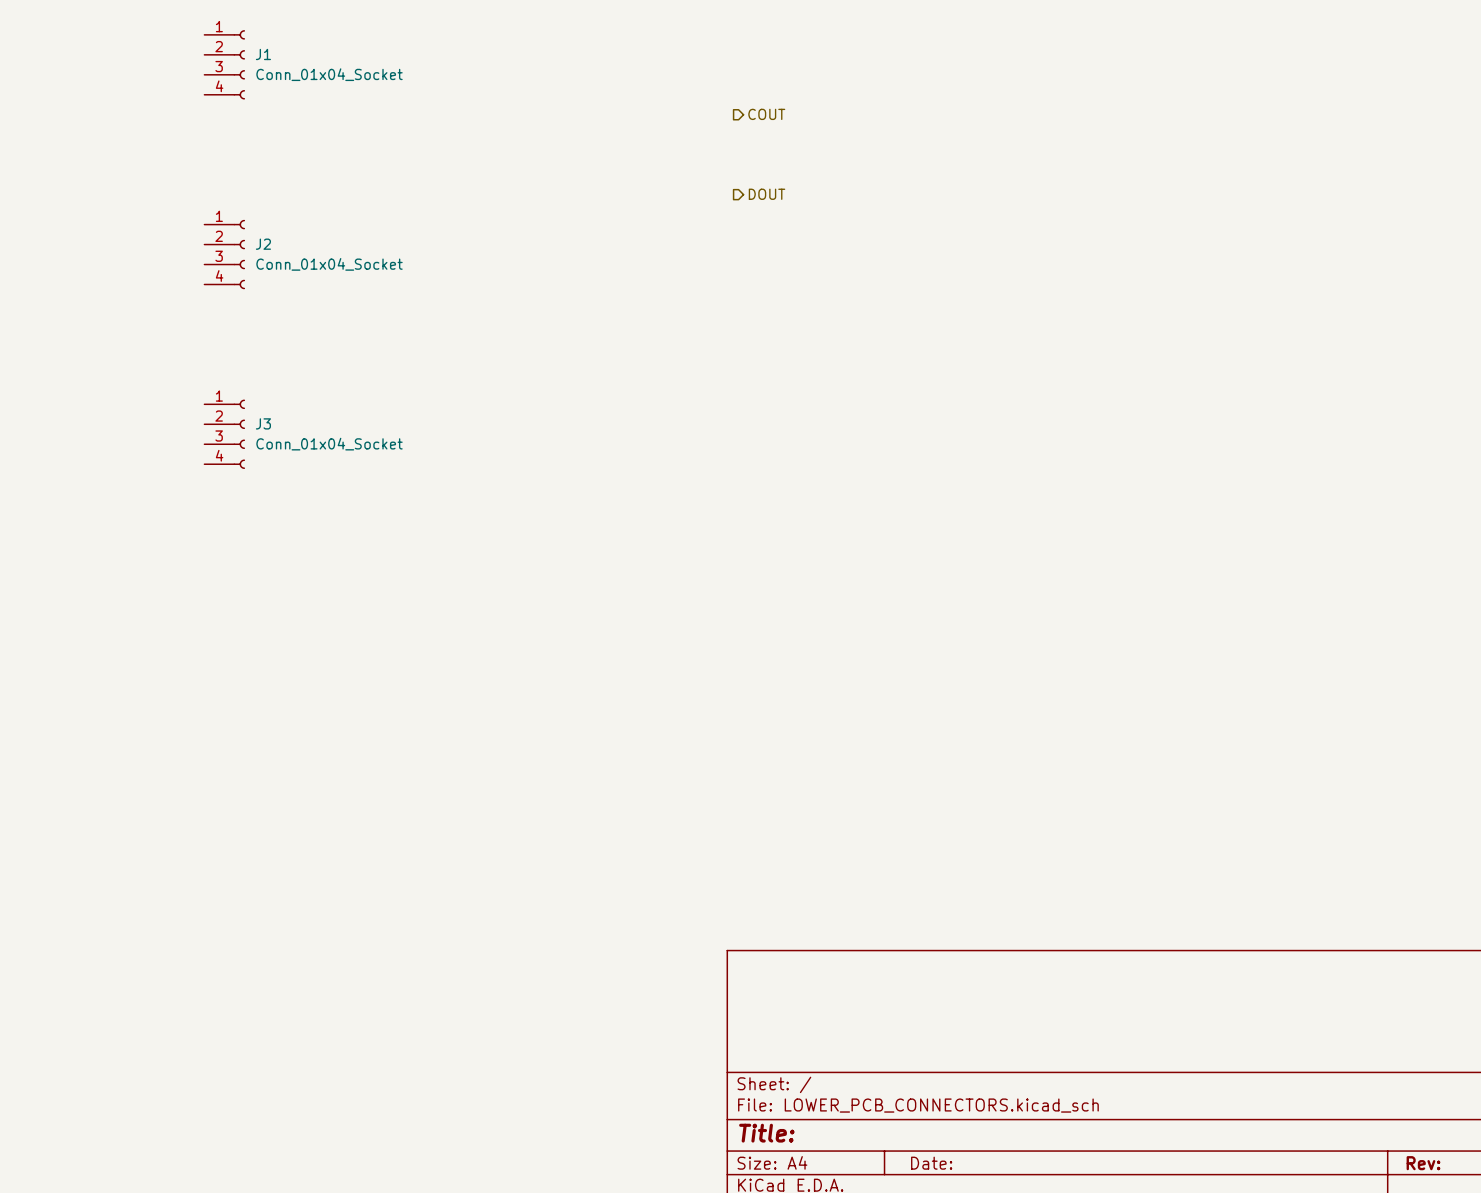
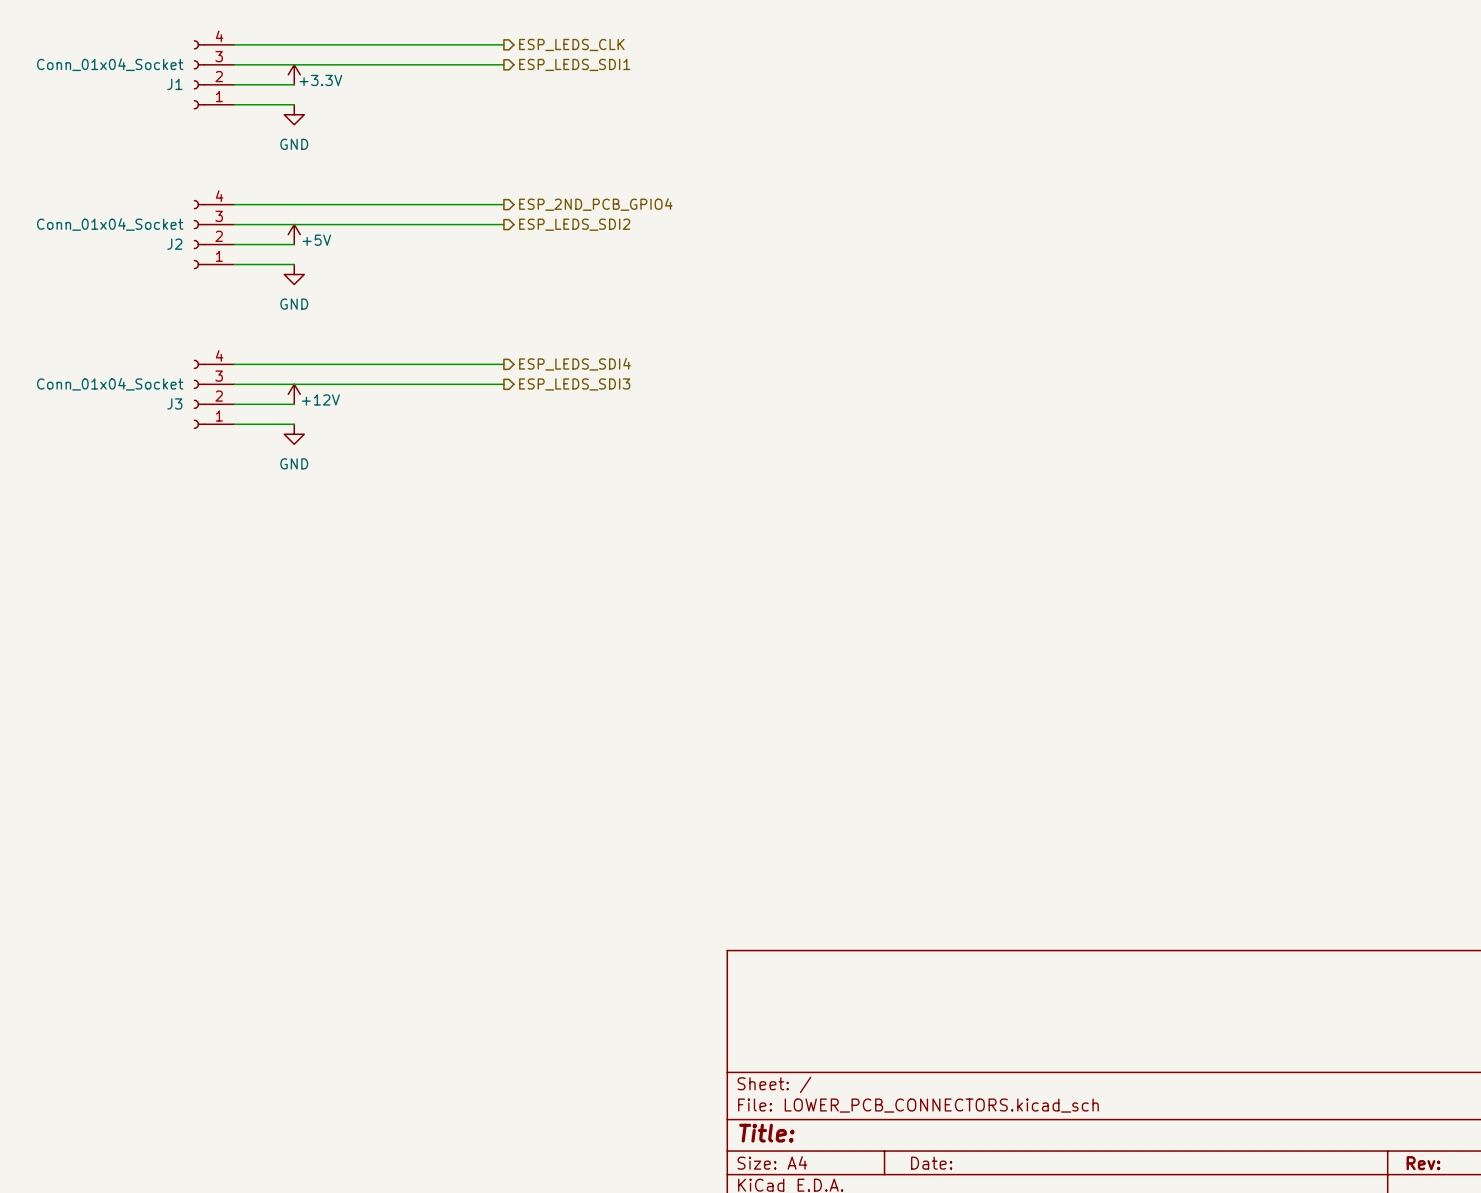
wire: none -> (234, 44) (503, 44)
hierarchical label: none -> ESP_LEDS_CLK (571, 44)
wire: none -> (234, 64) (503, 64)
J1 rotation: 0° (239, 64) -> 180° (199, 74)
hierarchical label: none -> ESP_LEDS_SDI1 (574, 64)
power symbol: none -> +3.3V (294, 74)
wire: none -> (234, 84) (294, 84)
wire: none -> (234, 104) (294, 104)
power symbol: none -> GND (294, 114)
hierarchical label: COUT (766, 114) -> none
hierarchical label: DOUT (767, 194) -> none
wire: none -> (234, 204) (503, 204)
hierarchical label: none -> ESP_2ND_PCB_GPIO4 (595, 204)
wire: none -> (234, 224) (503, 224)
hierarchical label: none -> ESP_LEDS_SDI2 (574, 224)
power symbol: none -> +5V (294, 234)
wire: none -> (234, 244) (294, 244)
J2 rotation: 0° (239, 254) -> 180° (199, 234)
wire: none -> (234, 264) (294, 264)
power symbol: none -> GND (294, 274)
wire: none -> (234, 364) (503, 364)
hierarchical label: none -> ESP_LEDS_SDI4 (574, 364)
wire: none -> (234, 384) (503, 384)
hierarchical label: none -> ESP_LEDS_SDI3 (574, 384)
power symbol: none -> +12V (294, 394)
wire: none -> (234, 404) (294, 404)
wire: none -> (234, 424) (294, 424)
J3 rotation: 0° (239, 434) -> 180° (199, 394)
power symbol: none -> GND (294, 434)

